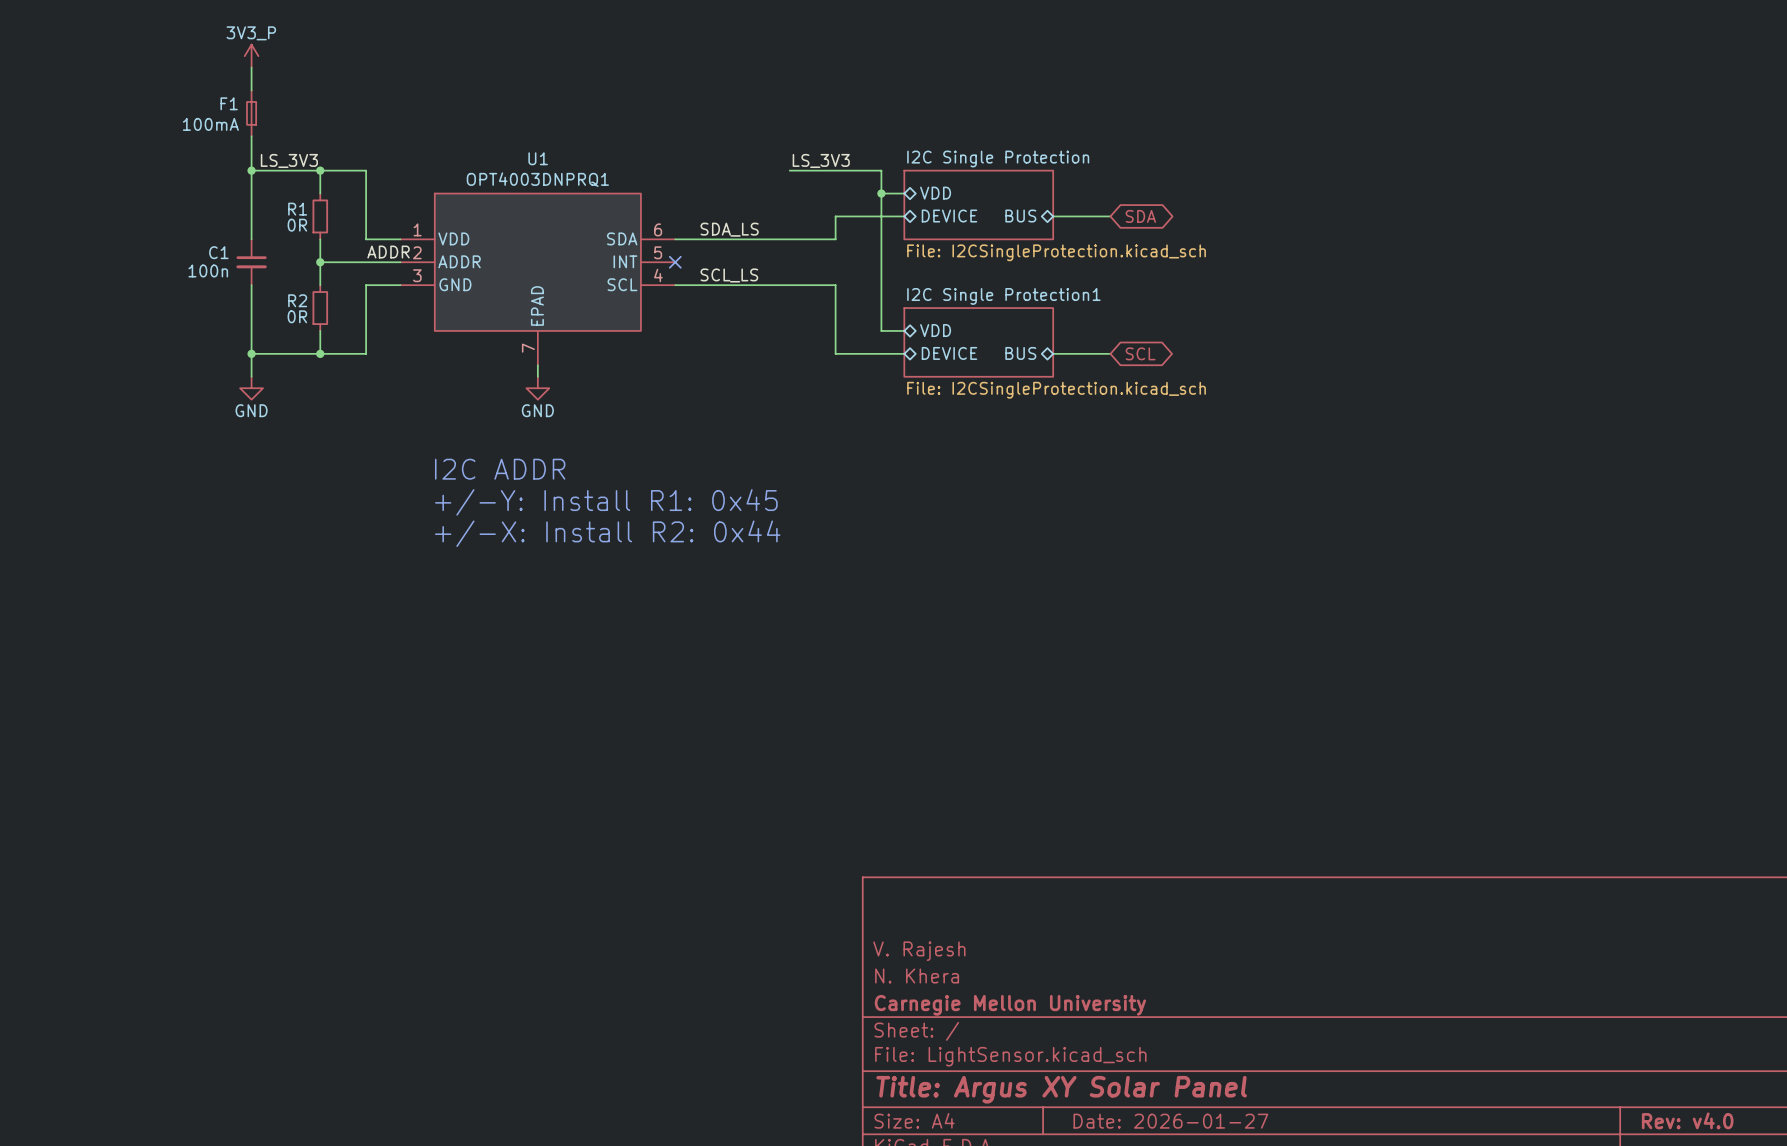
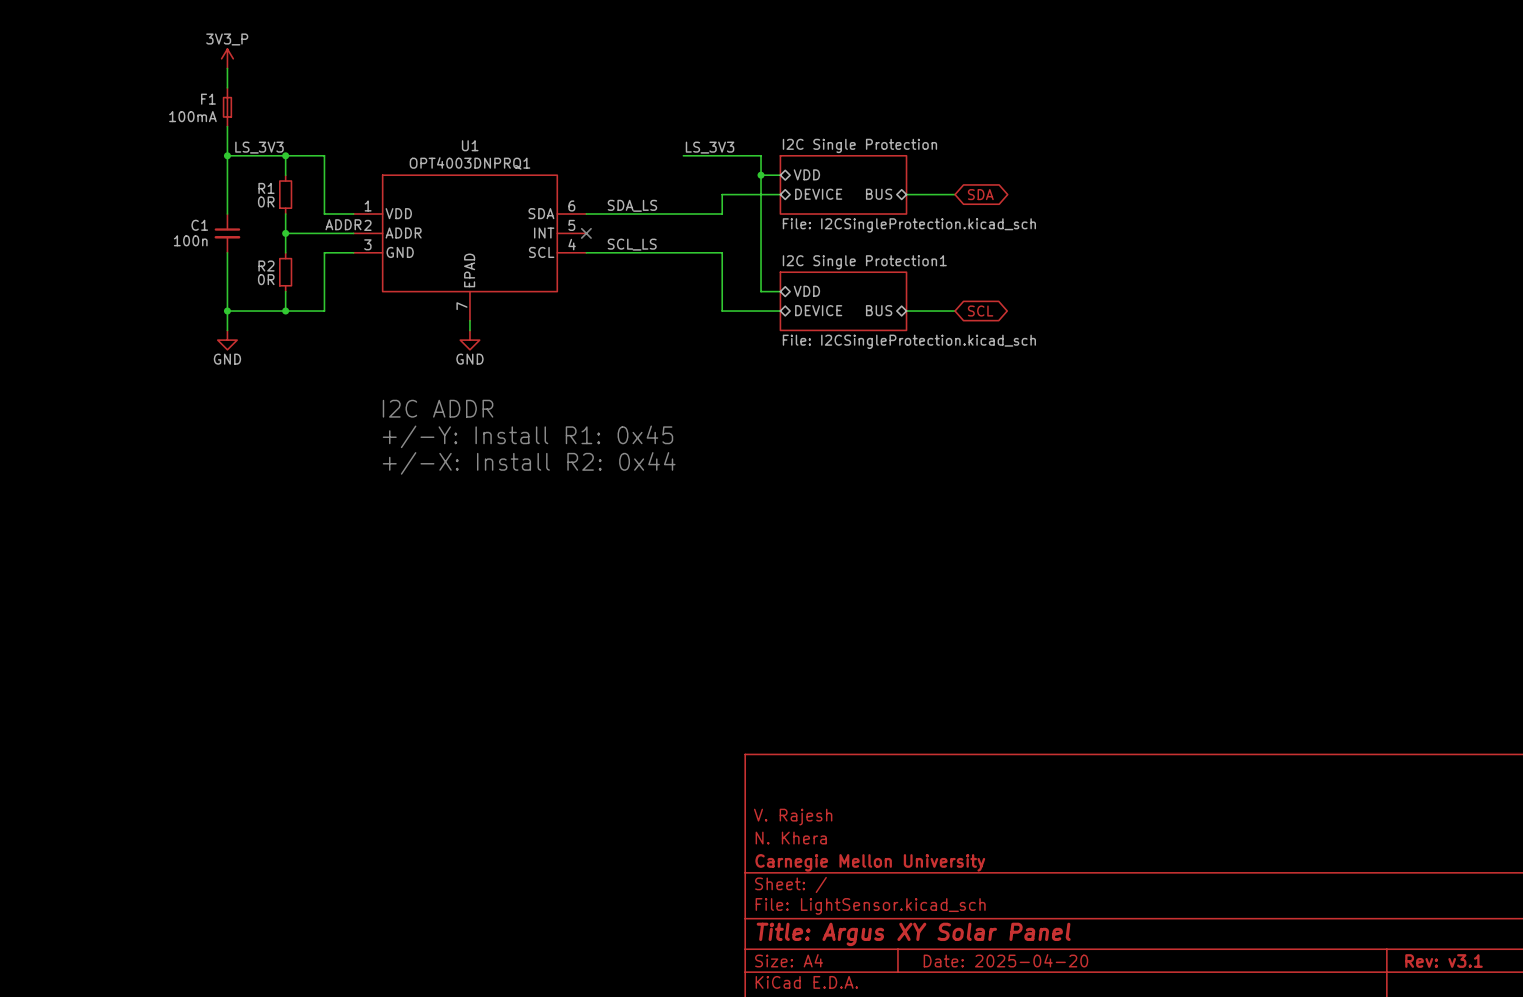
title block: Rev: v4.0 (1687, 1120) -> Rev: v3.1 (1444, 961)
title block: Date: 2026-01-27 (1170, 1121) -> Date: 2025-04-20 (1005, 960)

